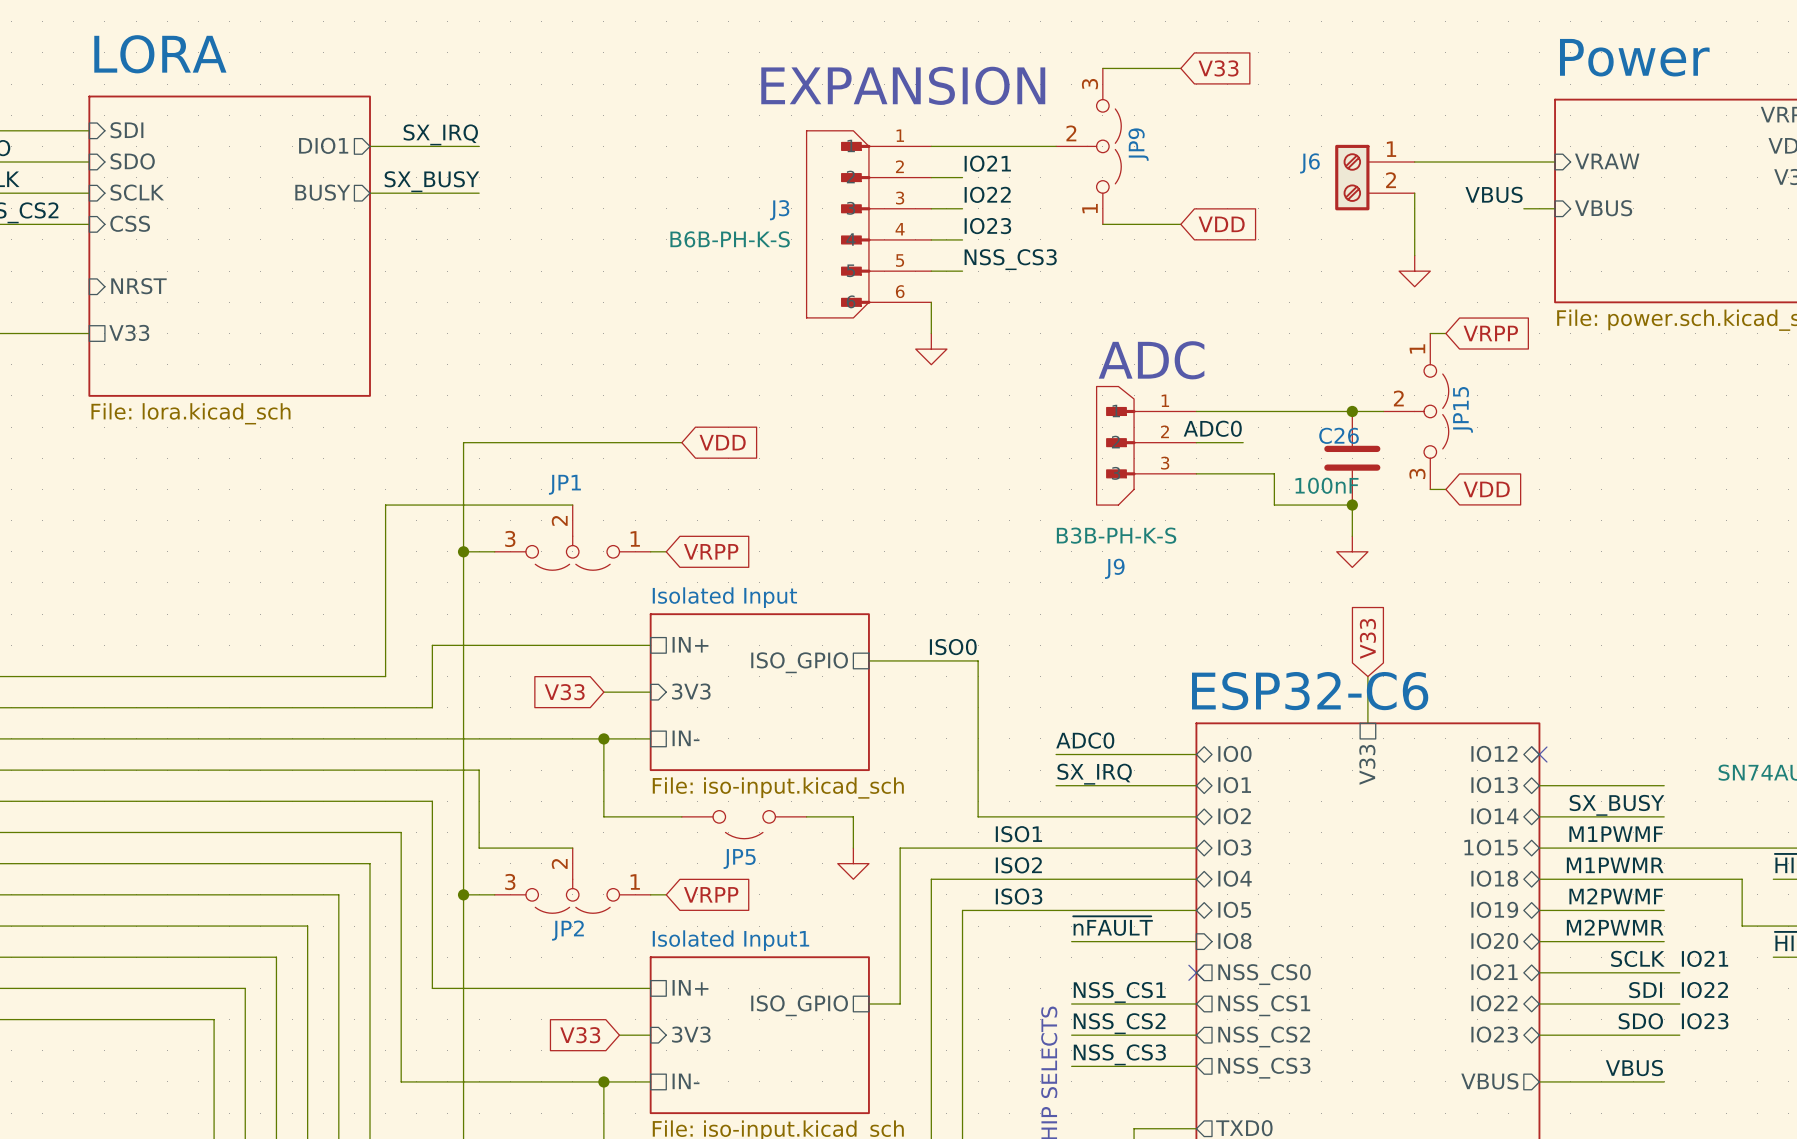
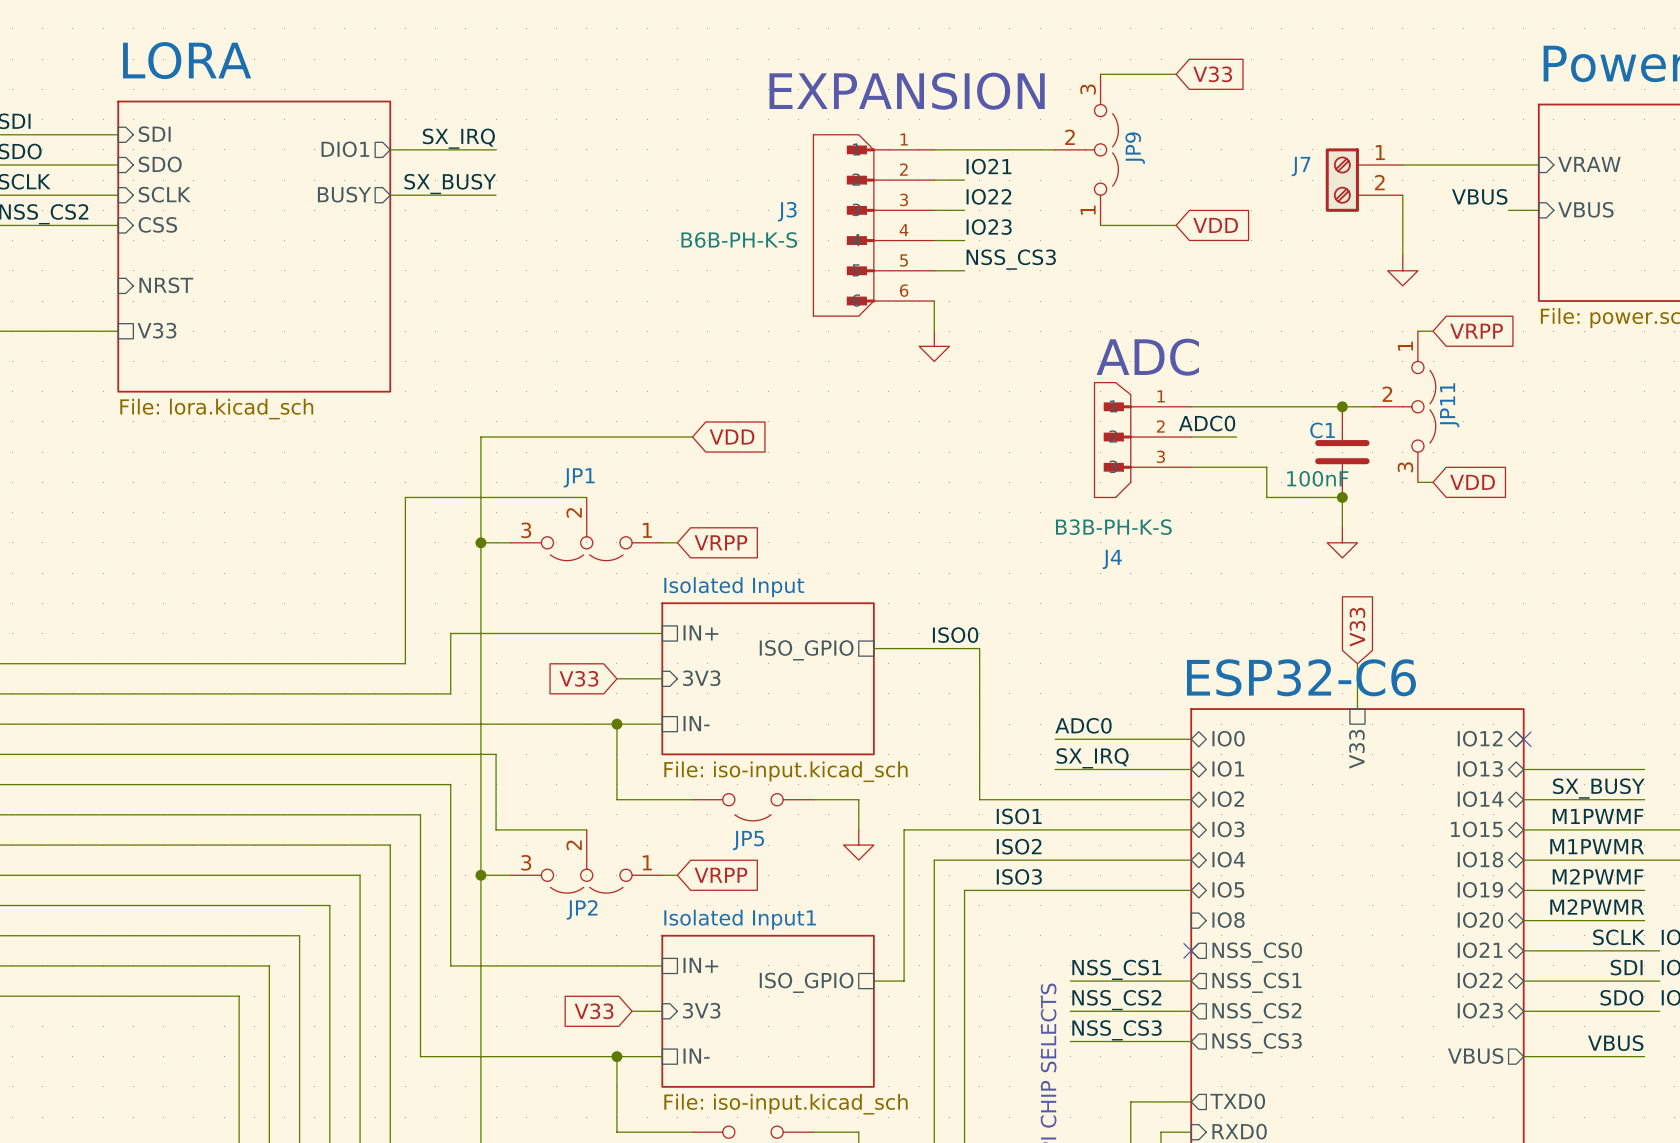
J6 name: J6 (1309, 163) -> J7 (1301, 166)
JP15 name: JP15 (1463, 409) -> JP11 (1449, 405)
C26 name: C26 (1339, 435) -> C1 (1322, 430)
J9 name: J9 (1114, 568) -> J4 (1112, 559)
label: ~{nFAULT} (1113, 926) -> none
wire: (1071, 941) (1196, 941) -> none

